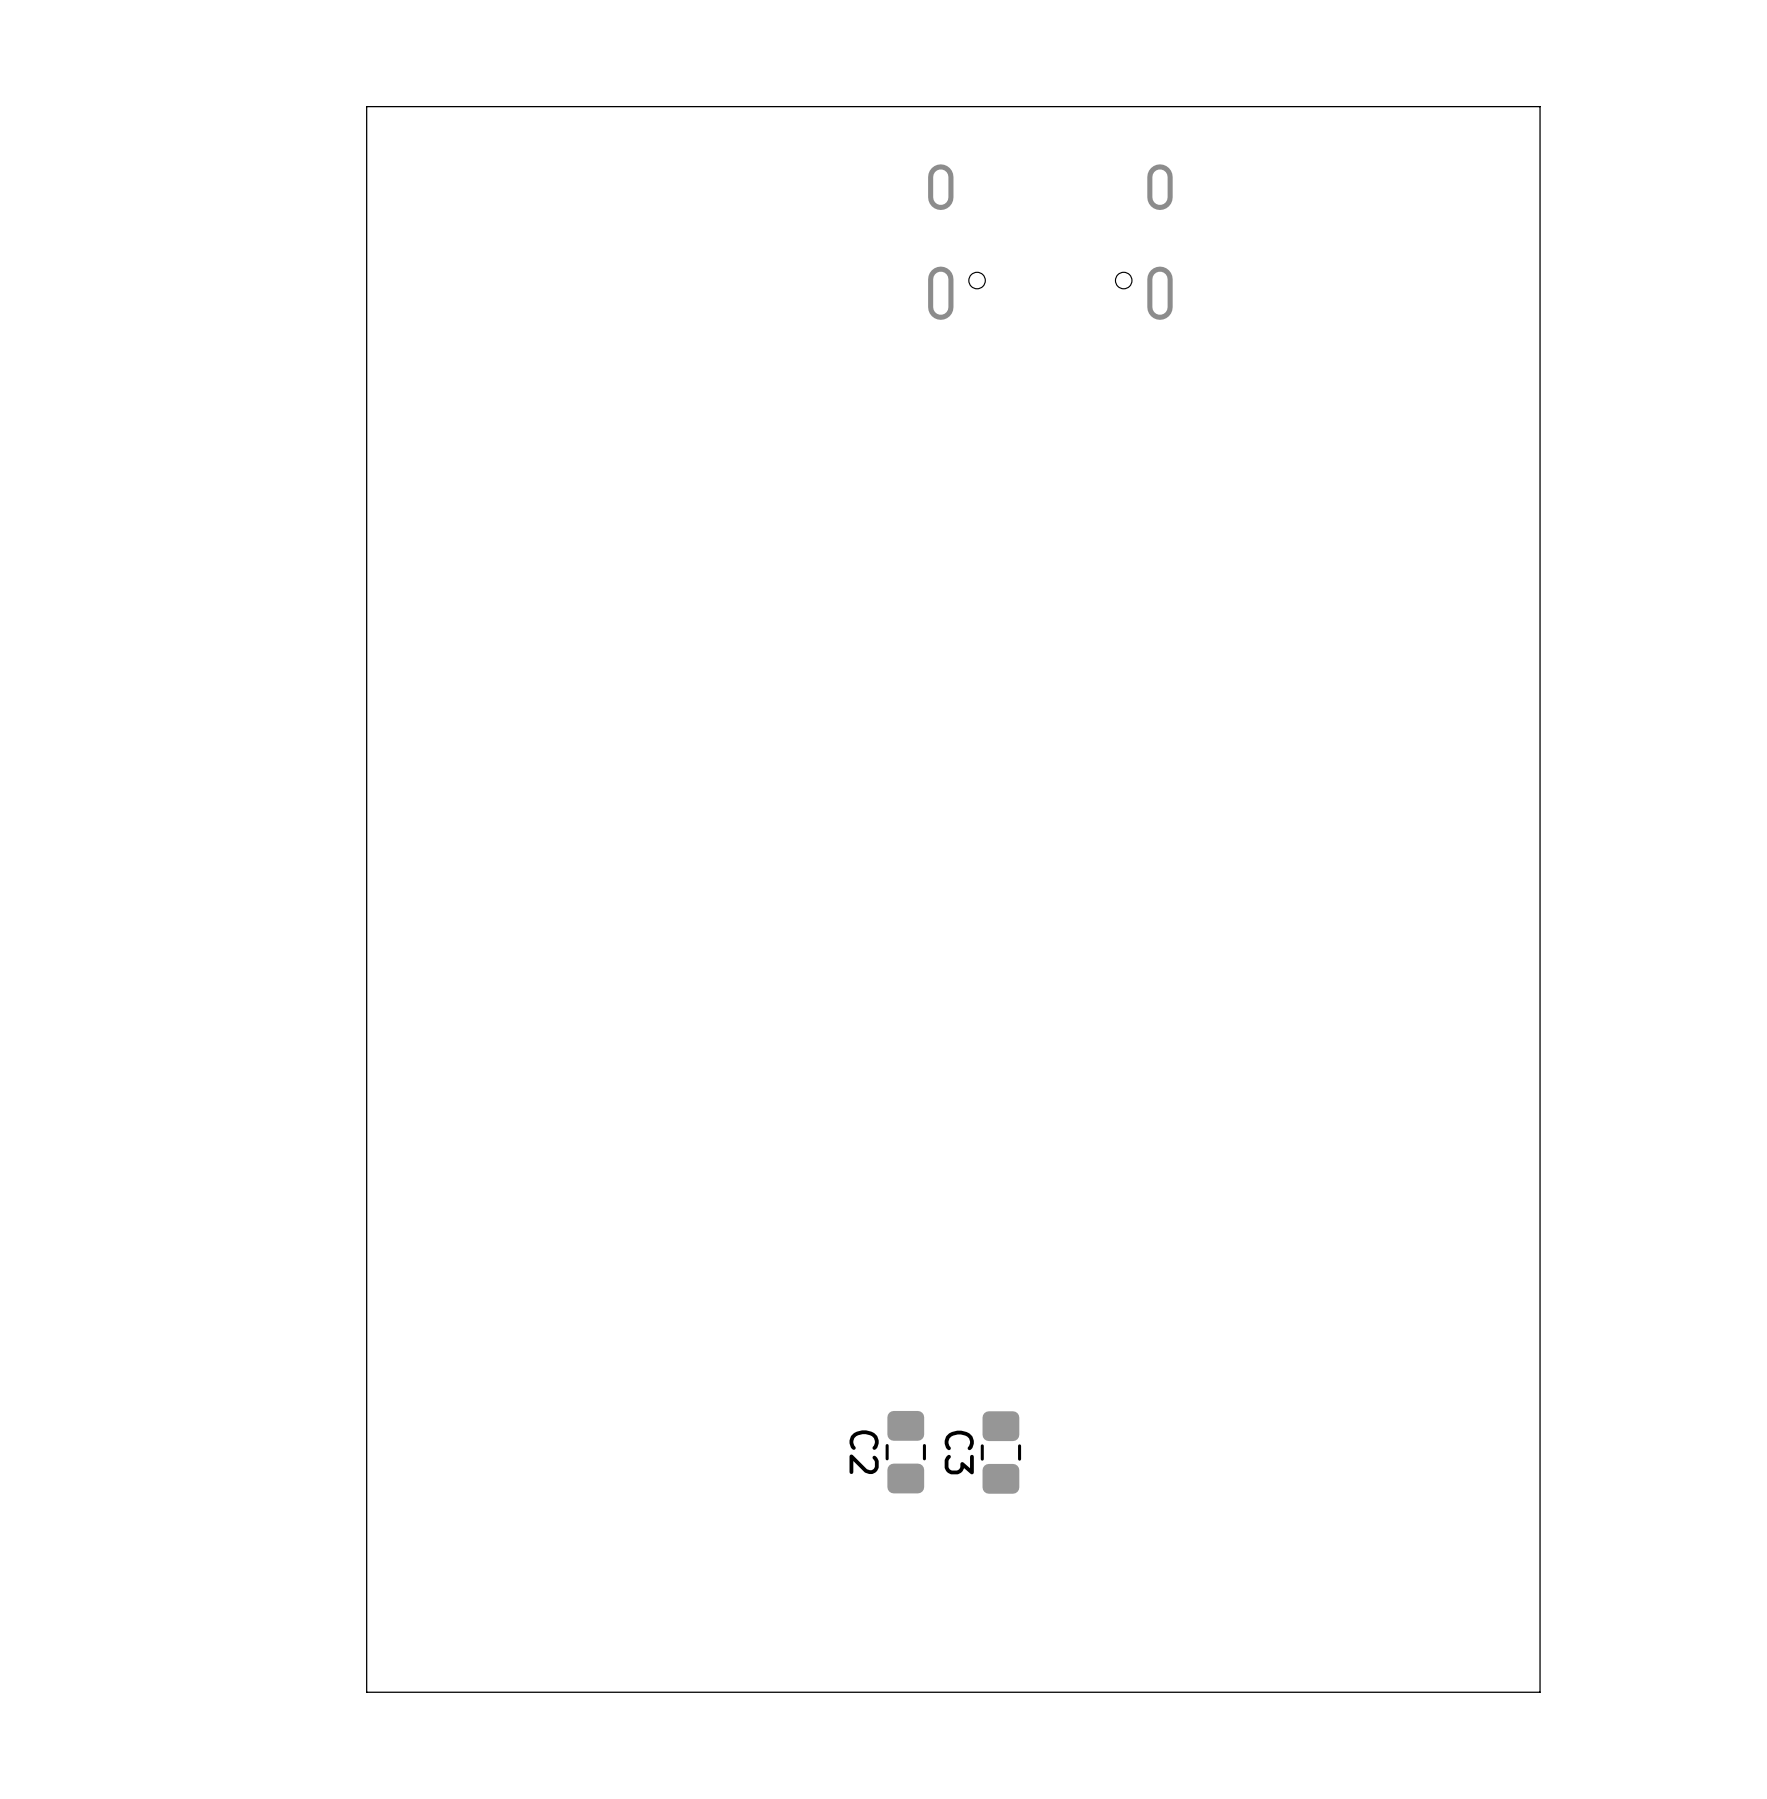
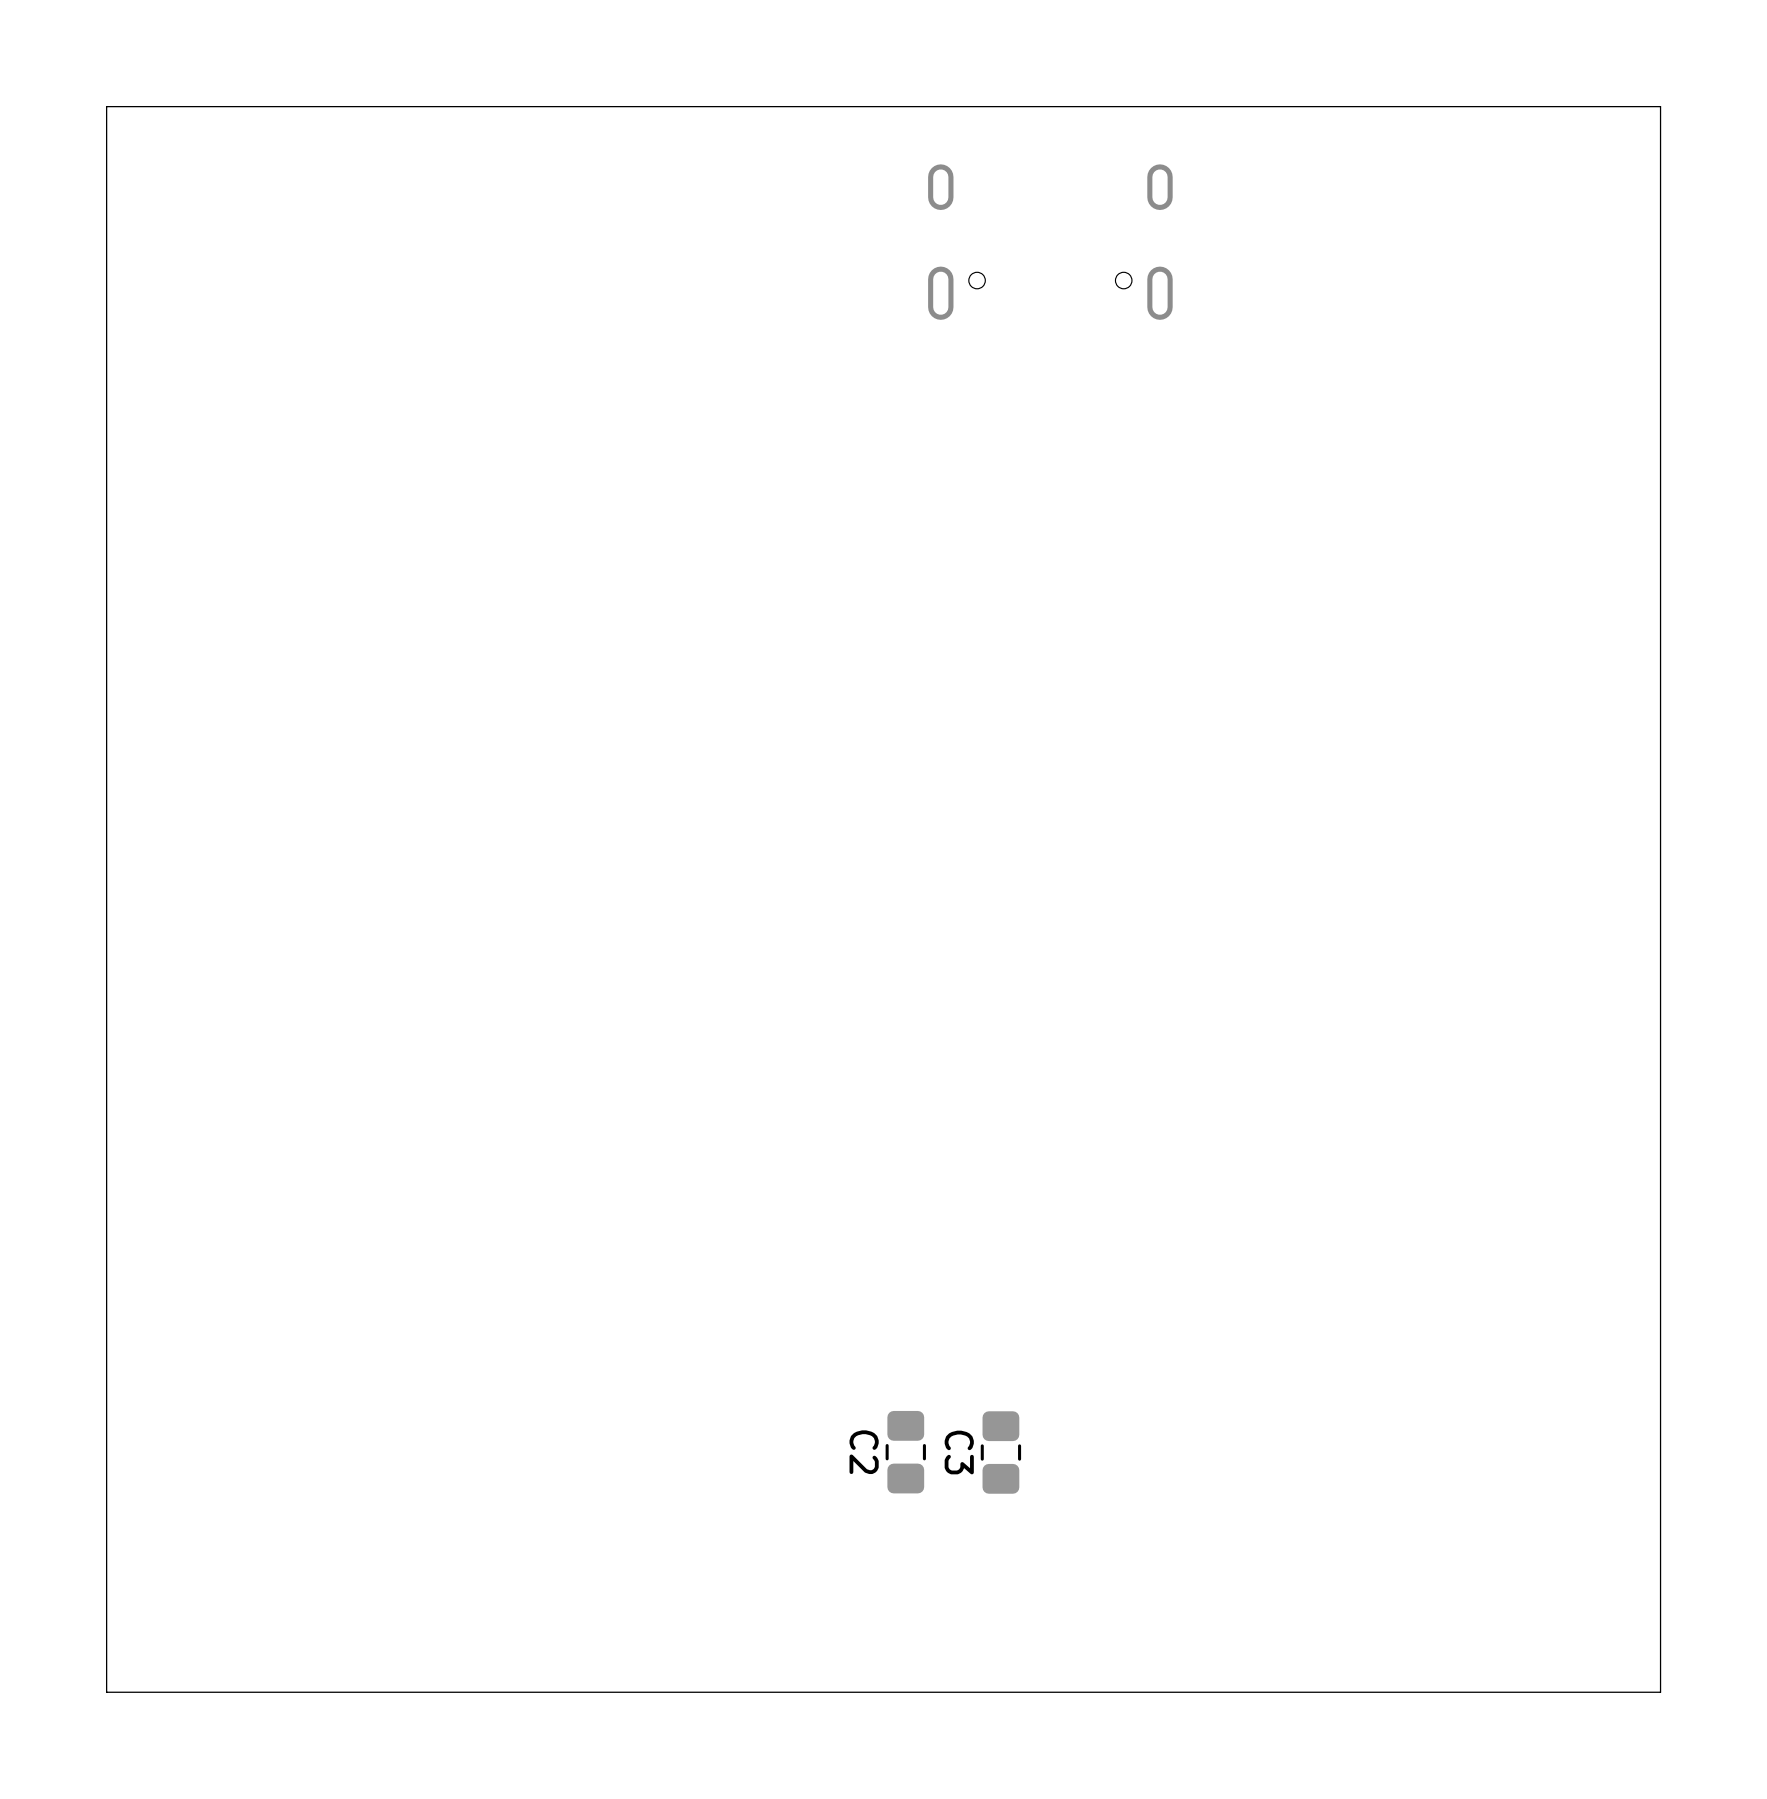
board edge: (366, 106) (366, 1692) -> (366, 106) (106, 106) (106, 1692) (366, 1692)
board edge: (1540, 106) (1540, 1692) -> (1540, 106) (1660, 106) (1660, 1692) (1540, 1692)

